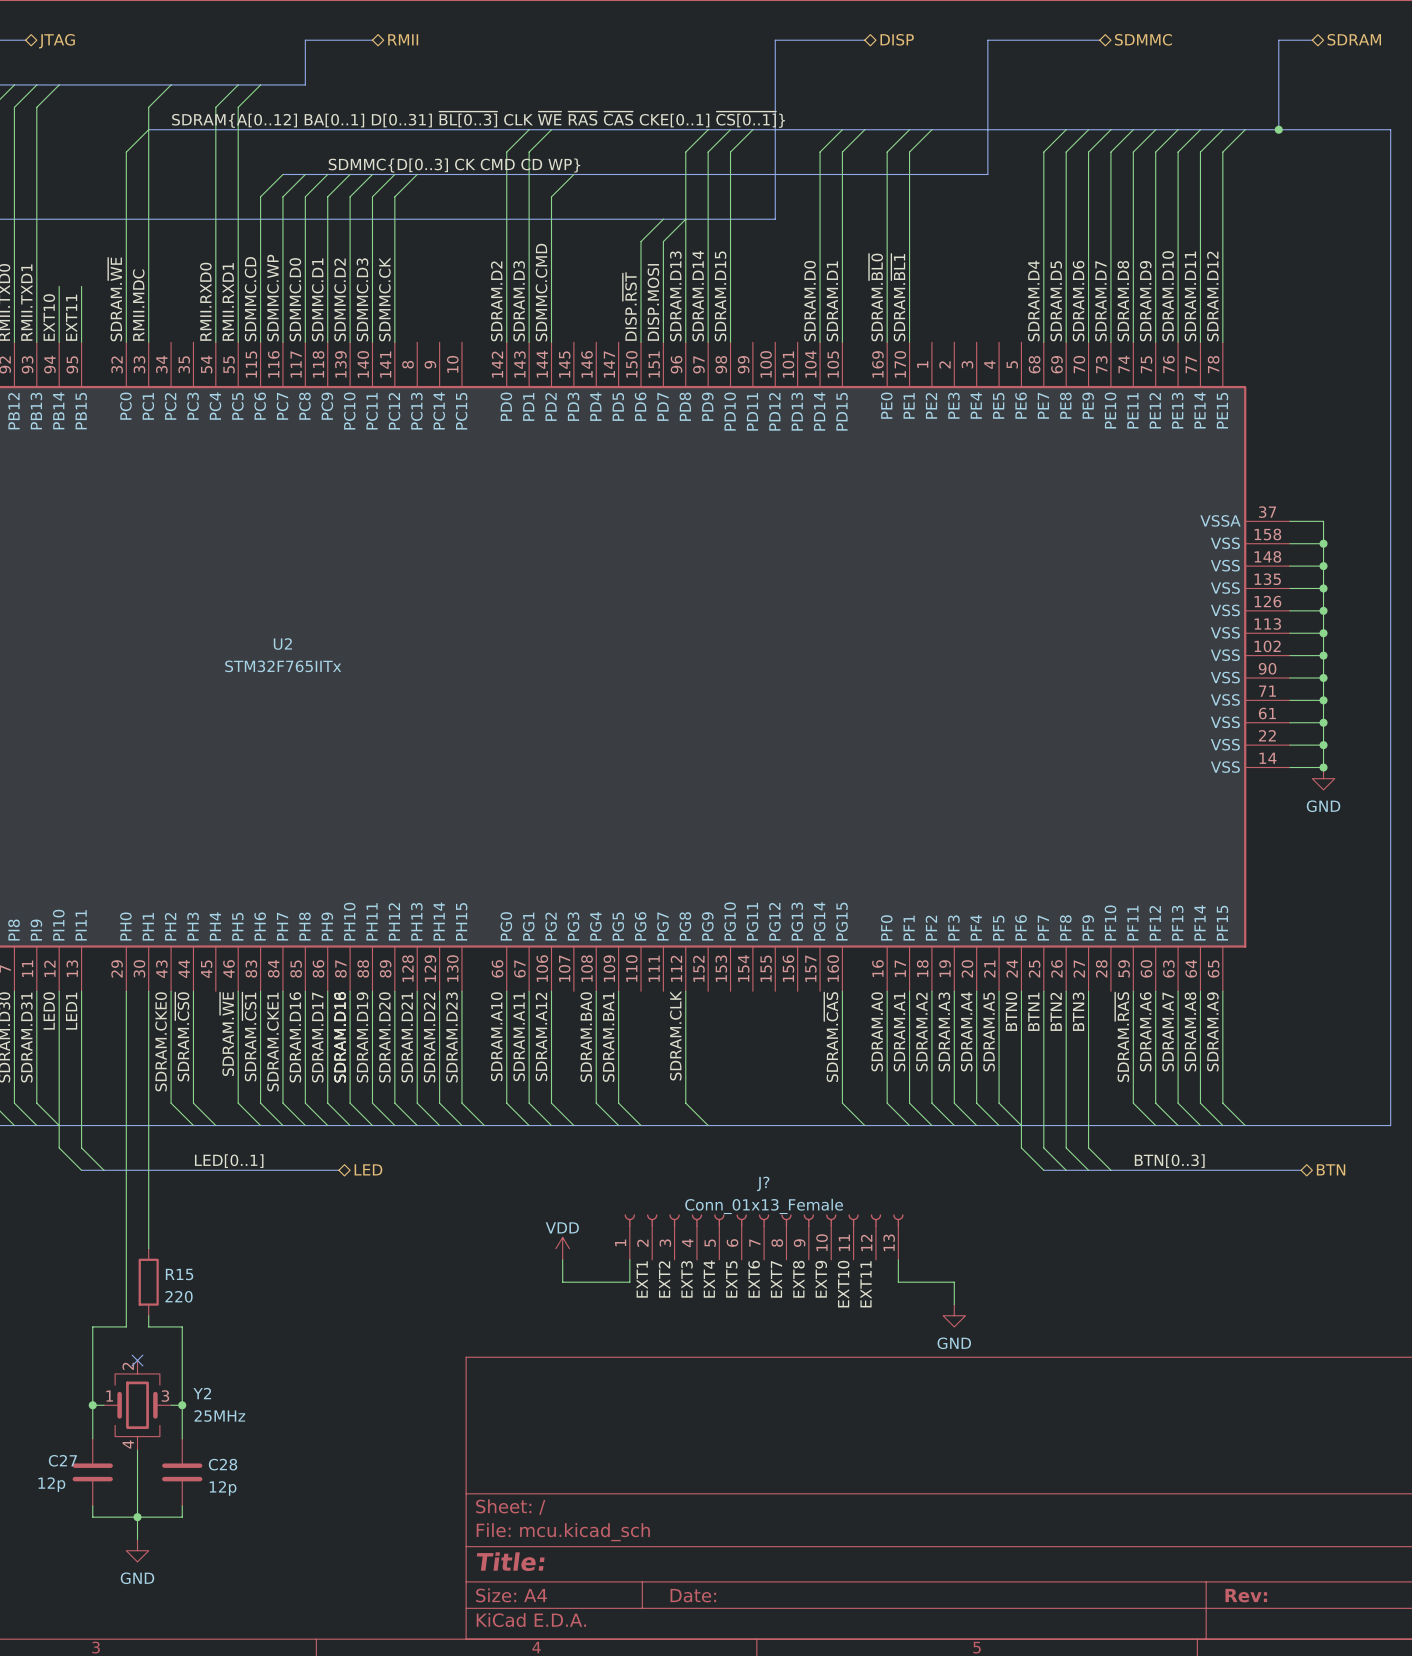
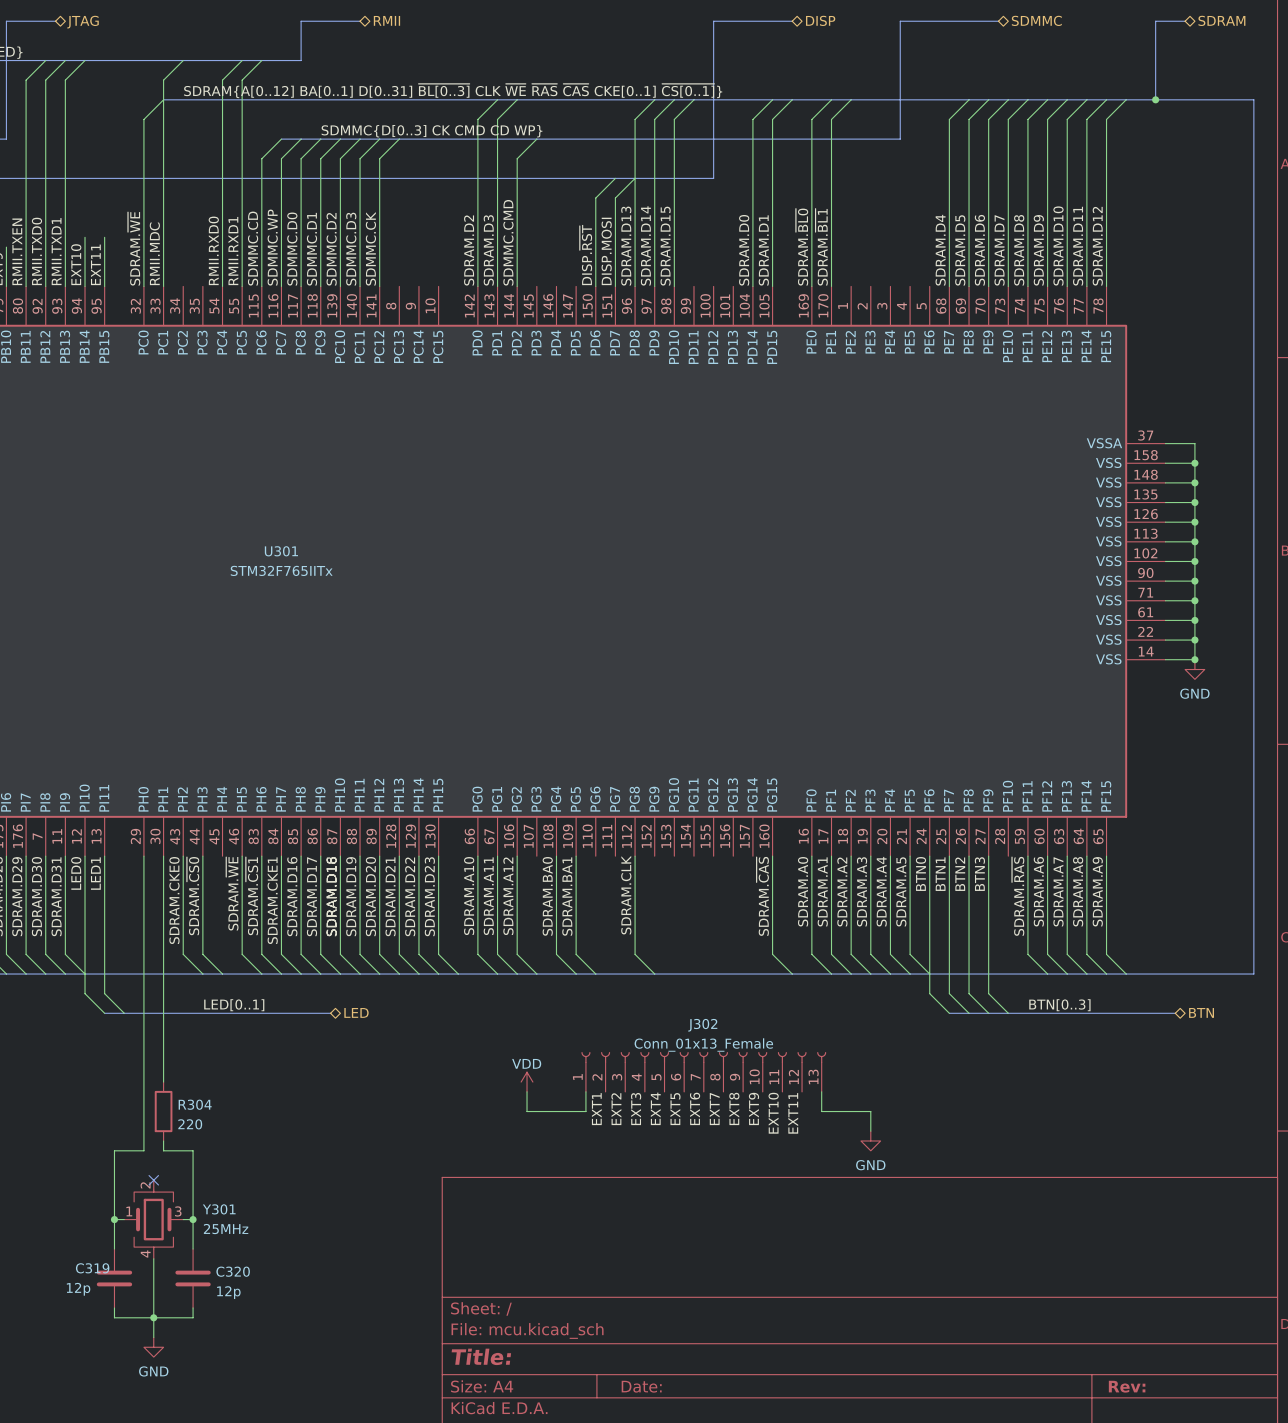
U2 name: U2 (282, 644) -> U301 (281, 551)
J? name: J? (763, 1183) -> J302 (702, 1025)
R15 name: R15 (179, 1274) -> R304 (195, 1104)
Y2 name: Y2 (202, 1393) -> Y301 (219, 1209)
C27 name: C27 (62, 1460) -> C319 (92, 1268)
C28 name: C28 (223, 1464) -> C320 (233, 1271)

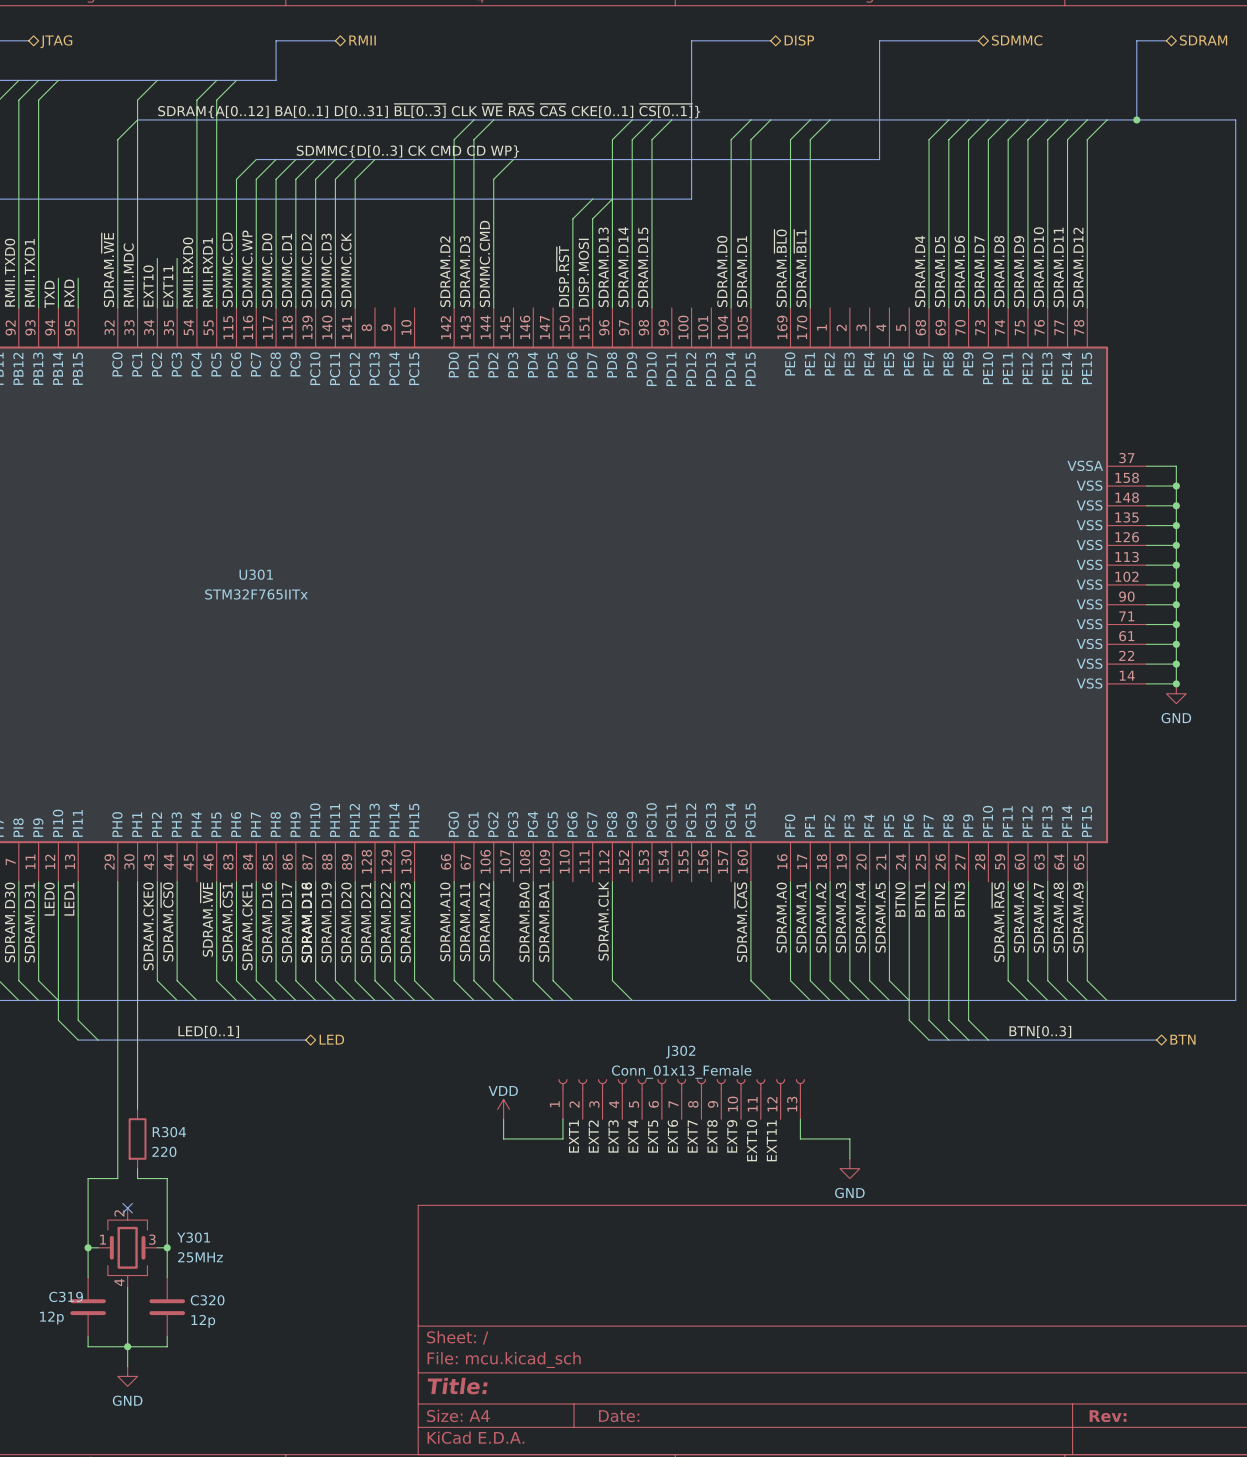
wire: (85, 237) (85, 256) -> none
wire: (104, 237) (104, 256) -> none
wire: none -> (157, 258) (157, 307)
wire: none -> (177, 258) (177, 307)
label: EXT10 (76, 264) -> TXD (49, 294)
label: EXT11 (95, 264) -> RXD (69, 293)
label: none -> EXT10 (148, 286)
label: none -> EXT11 (168, 286)

